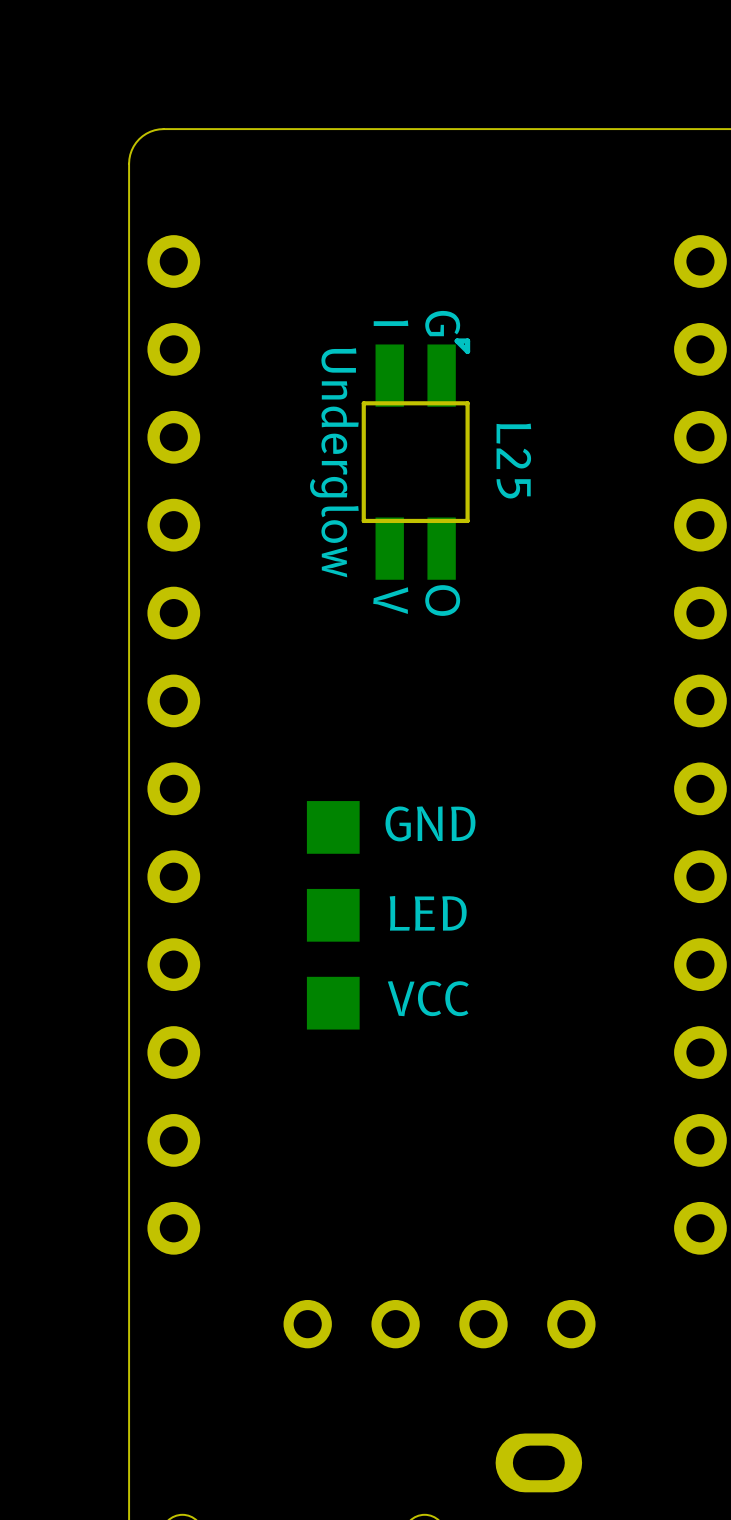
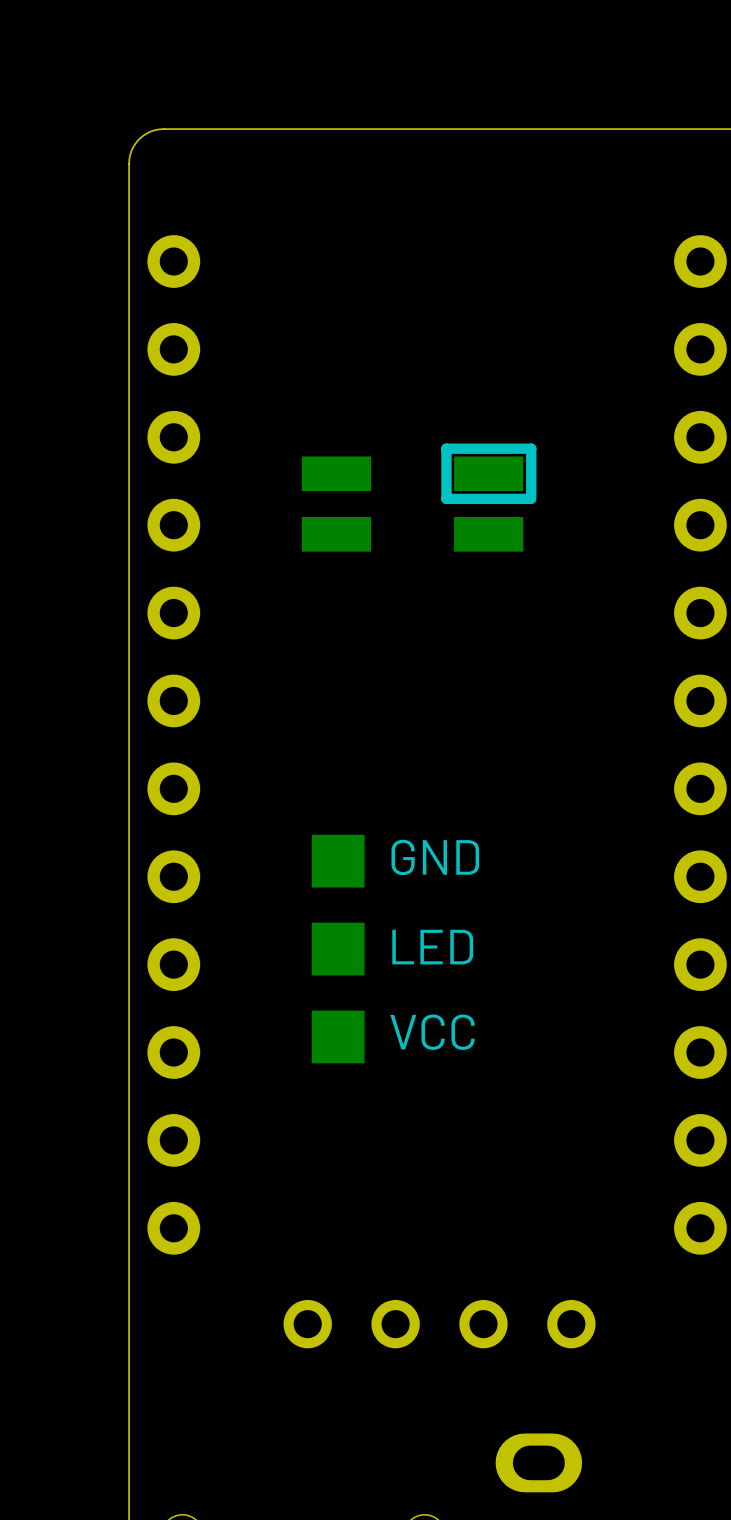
L25: (415, 459) -> none
part: none -> (419, 497)
part position: (333, 915) -> (338, 949)

